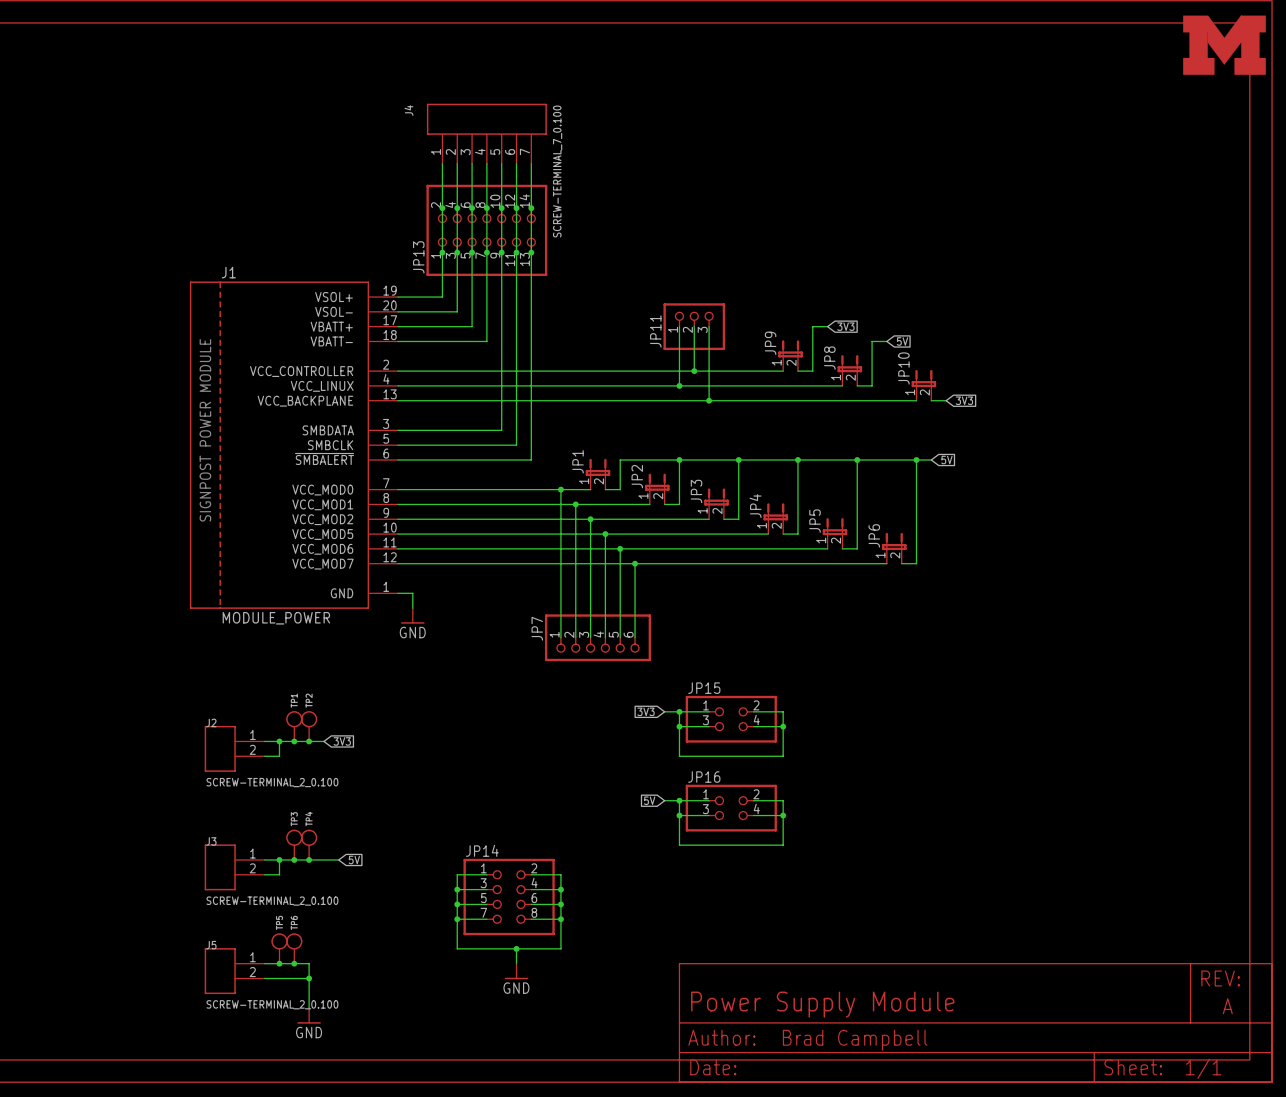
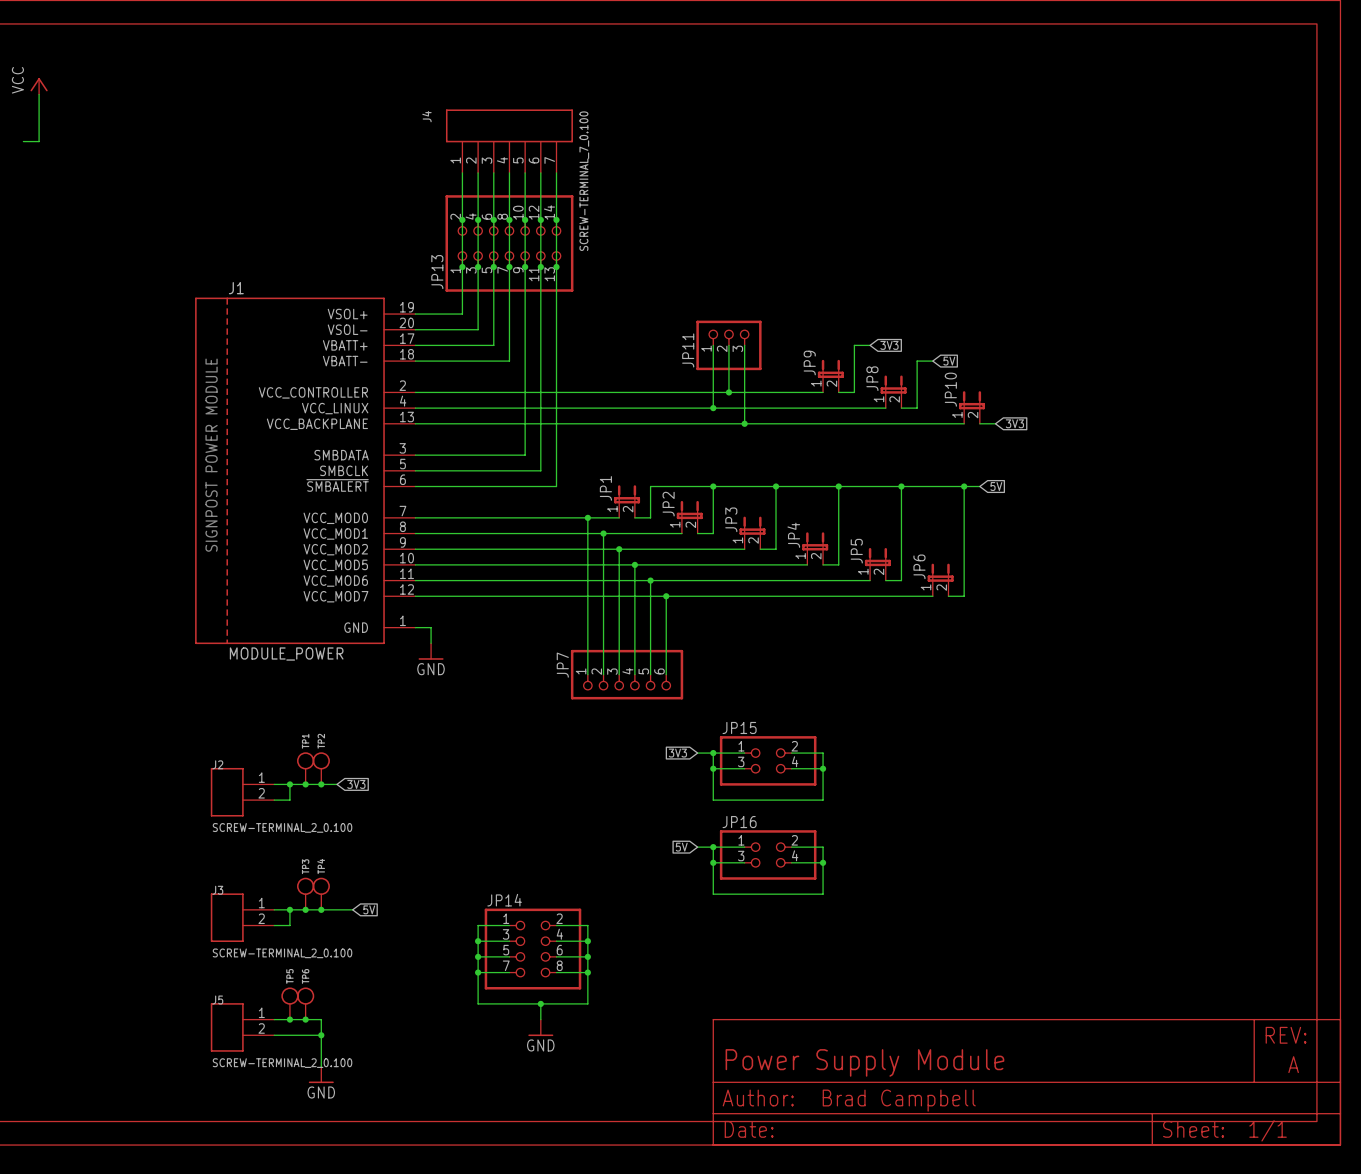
part: (1224, 45) -> none
power symbol: none -> VCC (39, 86)
wire: none -> (39, 94) (39, 141) (23, 141)

